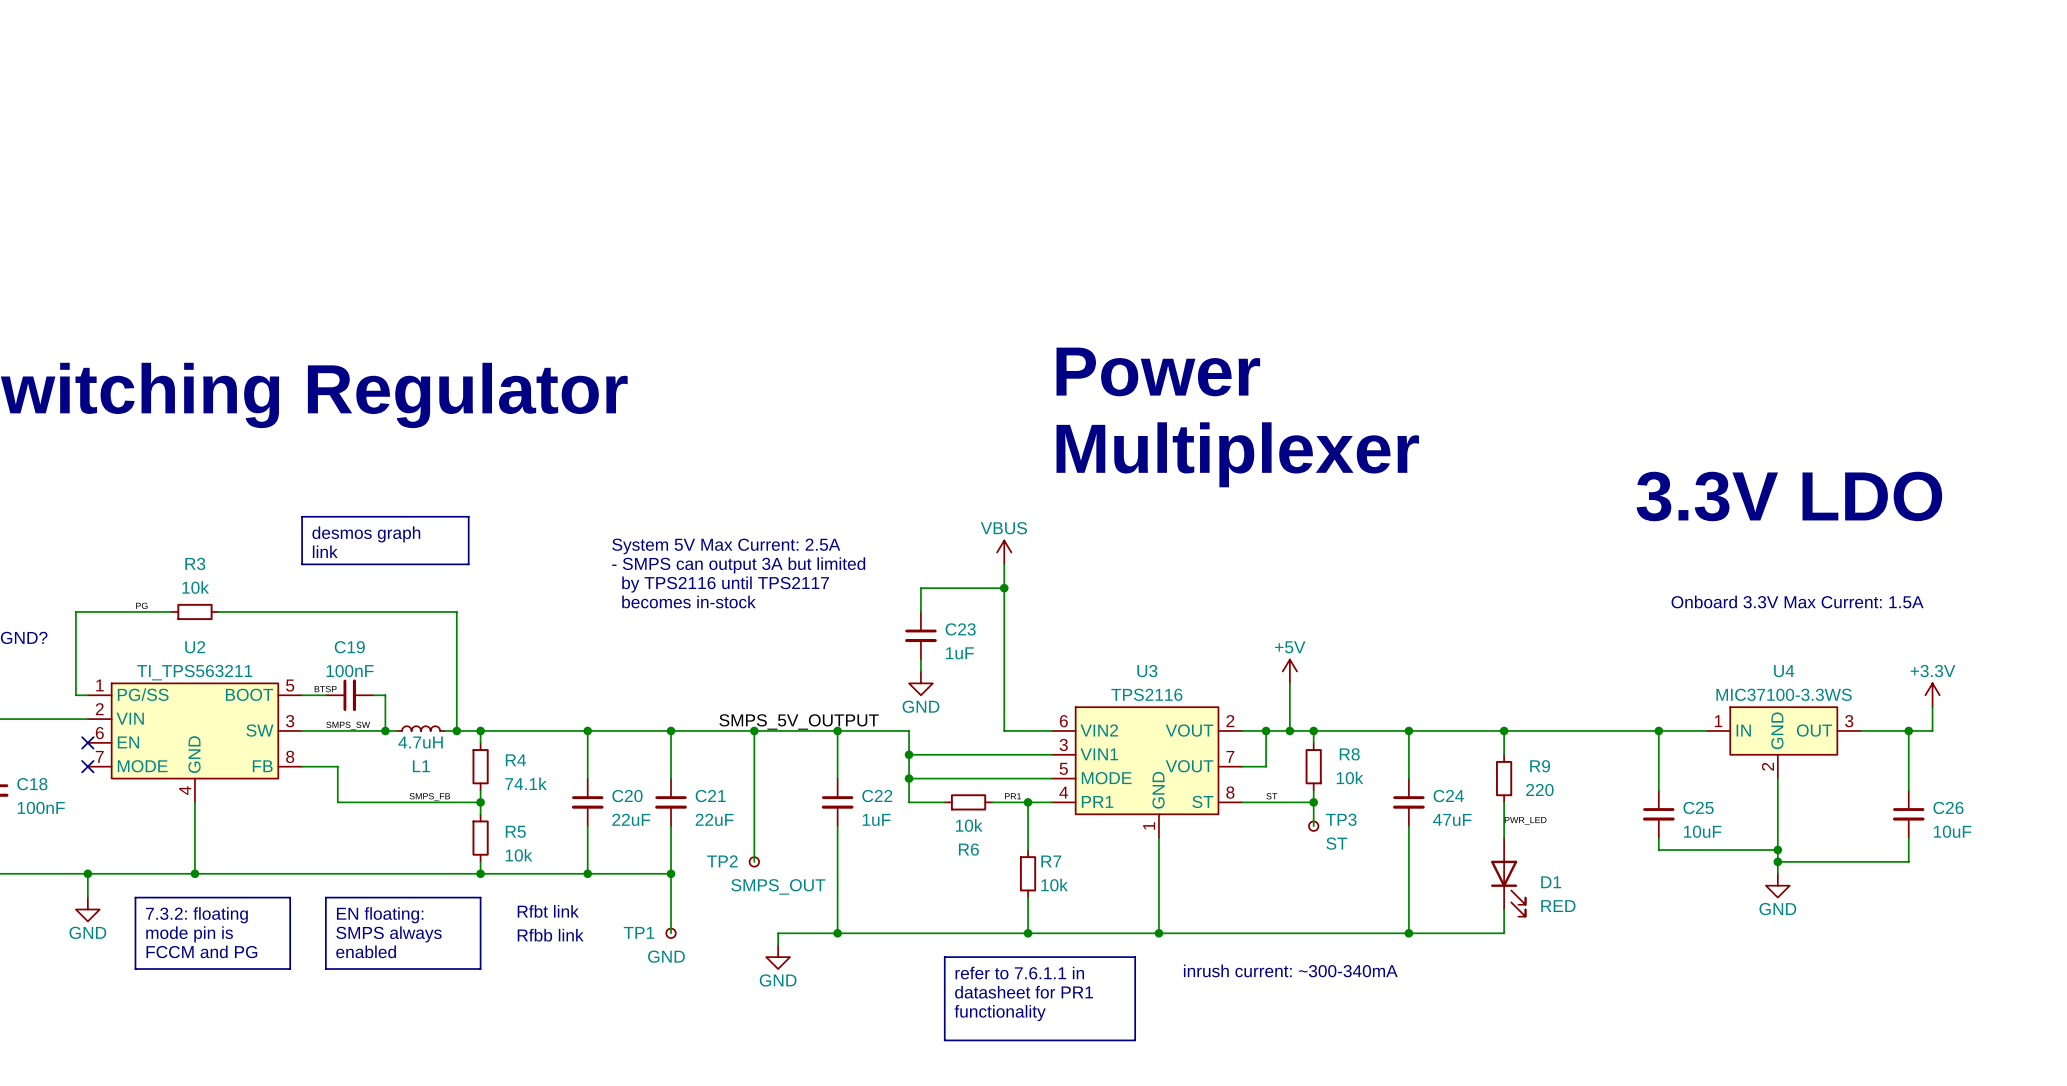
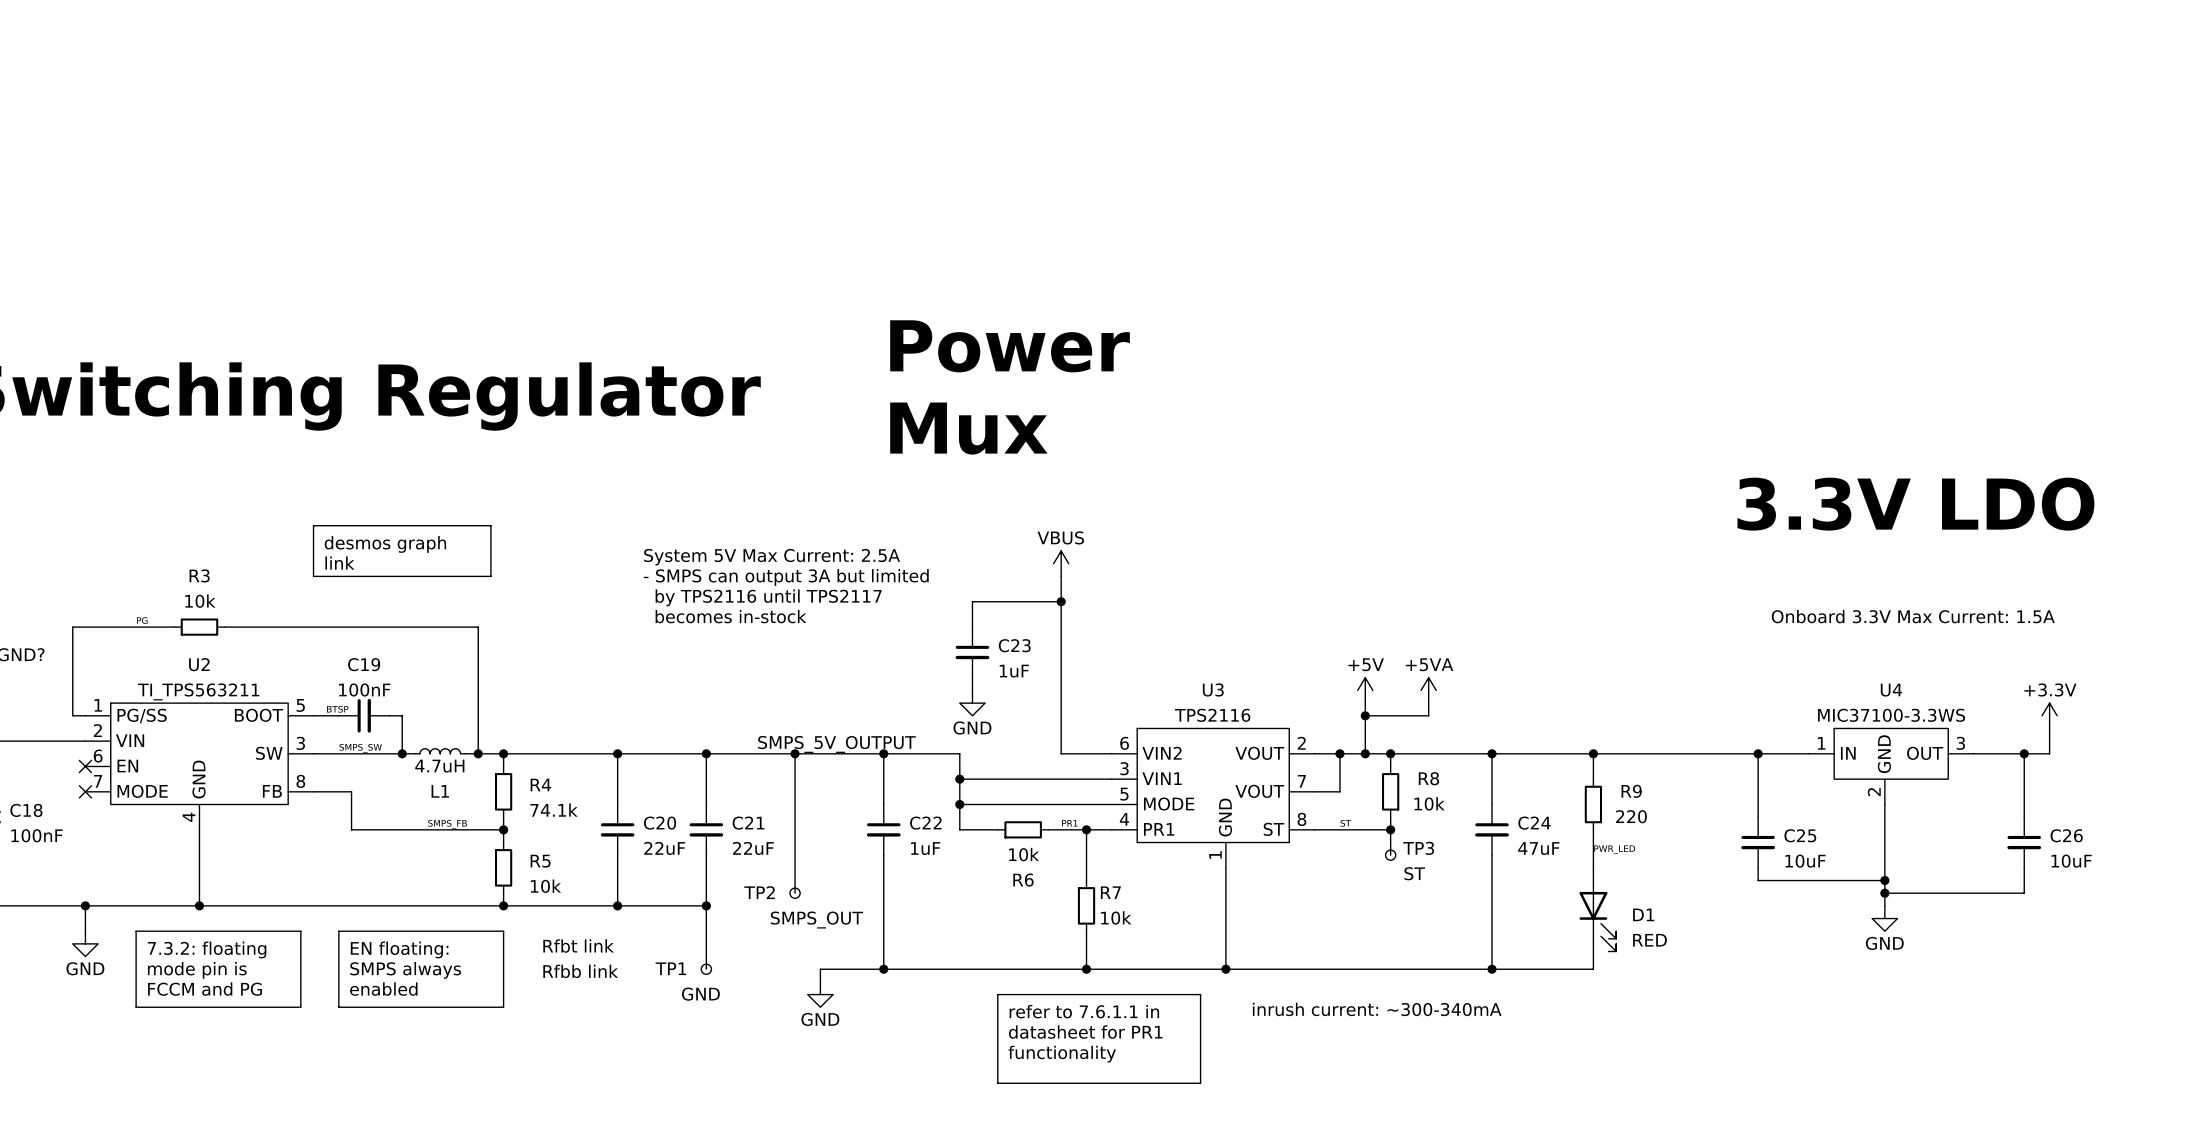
text position: Power (1158, 371) -> Power (1010, 346)
text: none -> Mux (968, 428)
text: Multiplexer (1237, 454) -> none
power symbol: none -> +5VA (1428, 690)
wire: none -> (1428, 703) (1428, 715) (1365, 715)
junction: none -> (1365, 715)

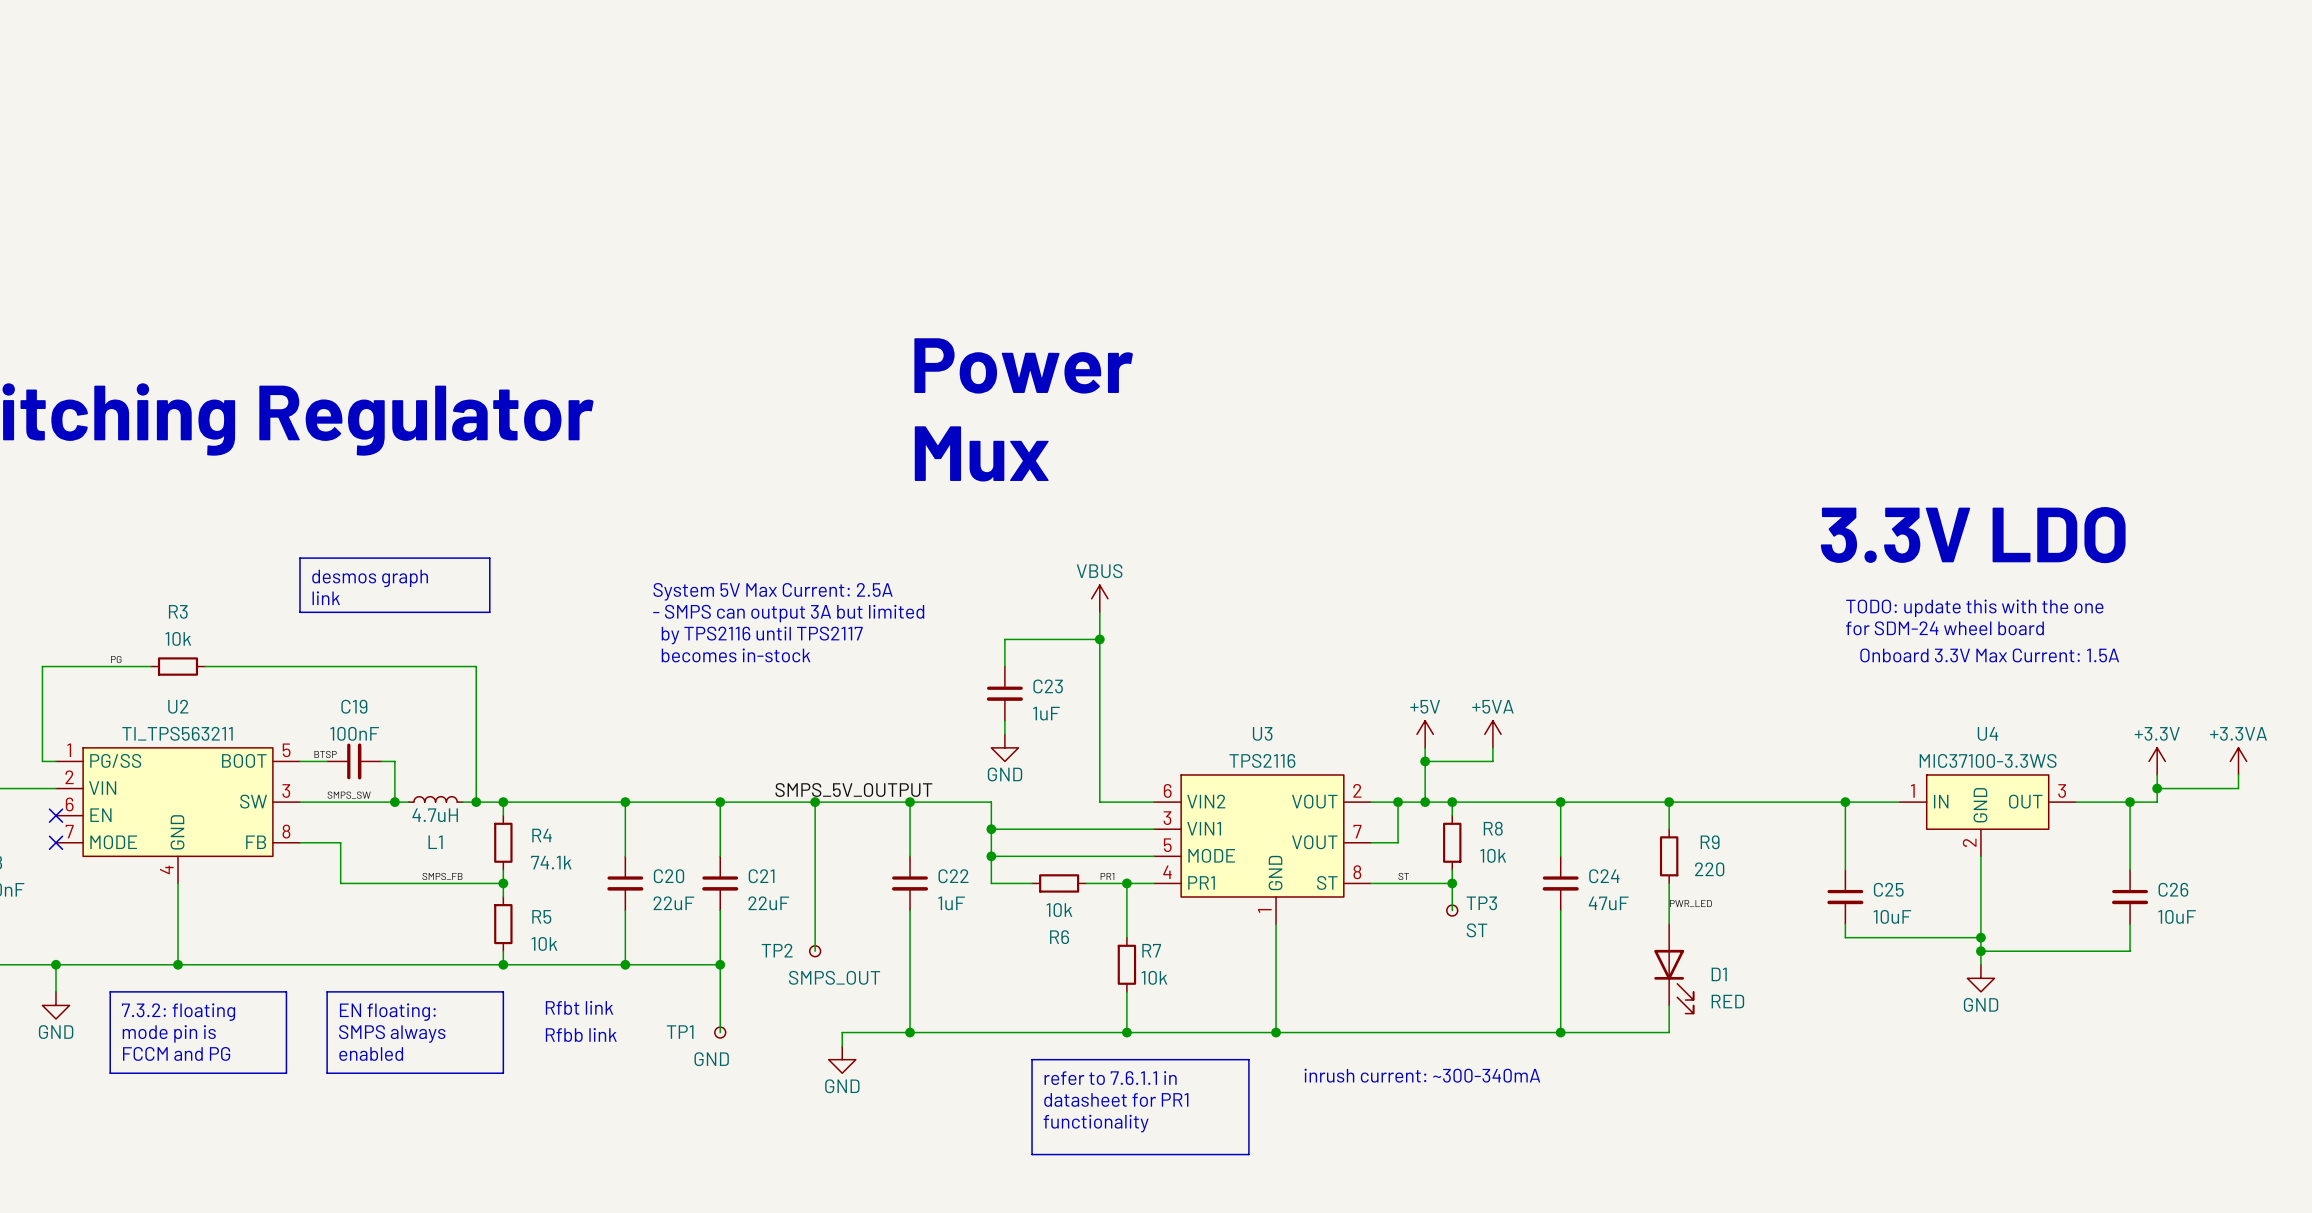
text: none -> TODO: update this with the one (1974, 608)
text: none -> for SDM-24 wheel board (1944, 628)
power symbol: none -> +3.3VA (2238, 761)
wire: none -> (2238, 774) (2238, 788) (2157, 788)
junction: none -> (2157, 788)

